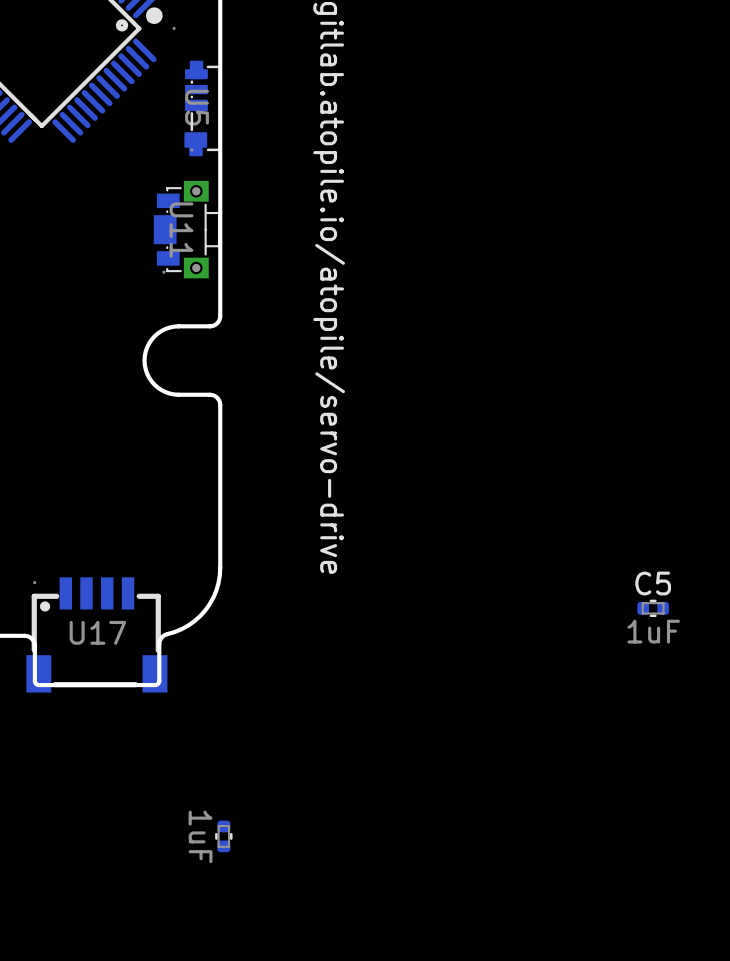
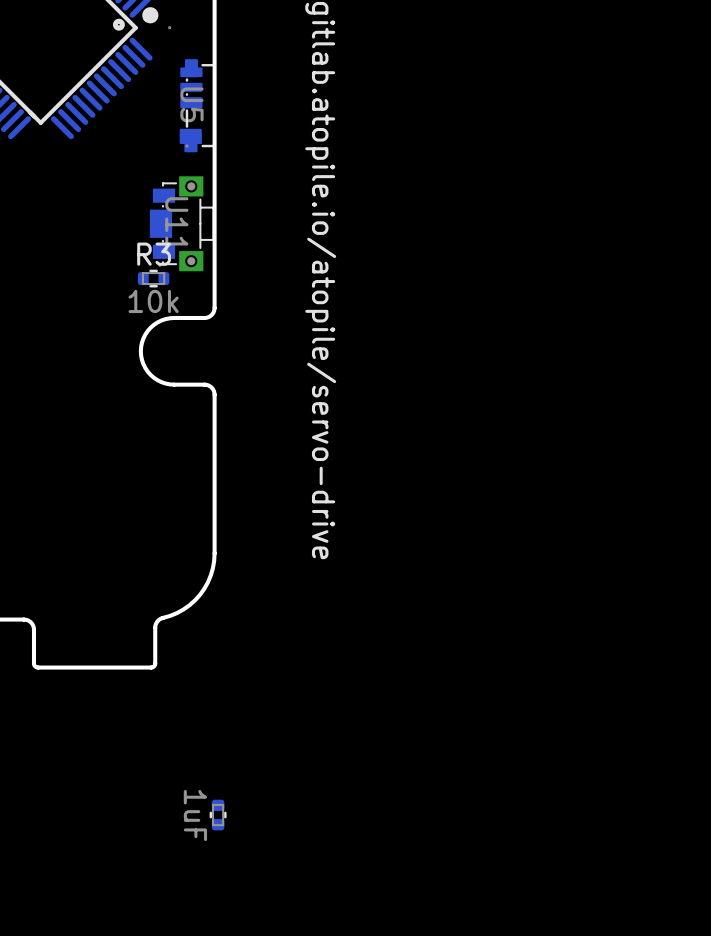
R3: none -> 10k (153, 278)
C5: 1uF (653, 608) -> none
U17: (96, 634) -> none

